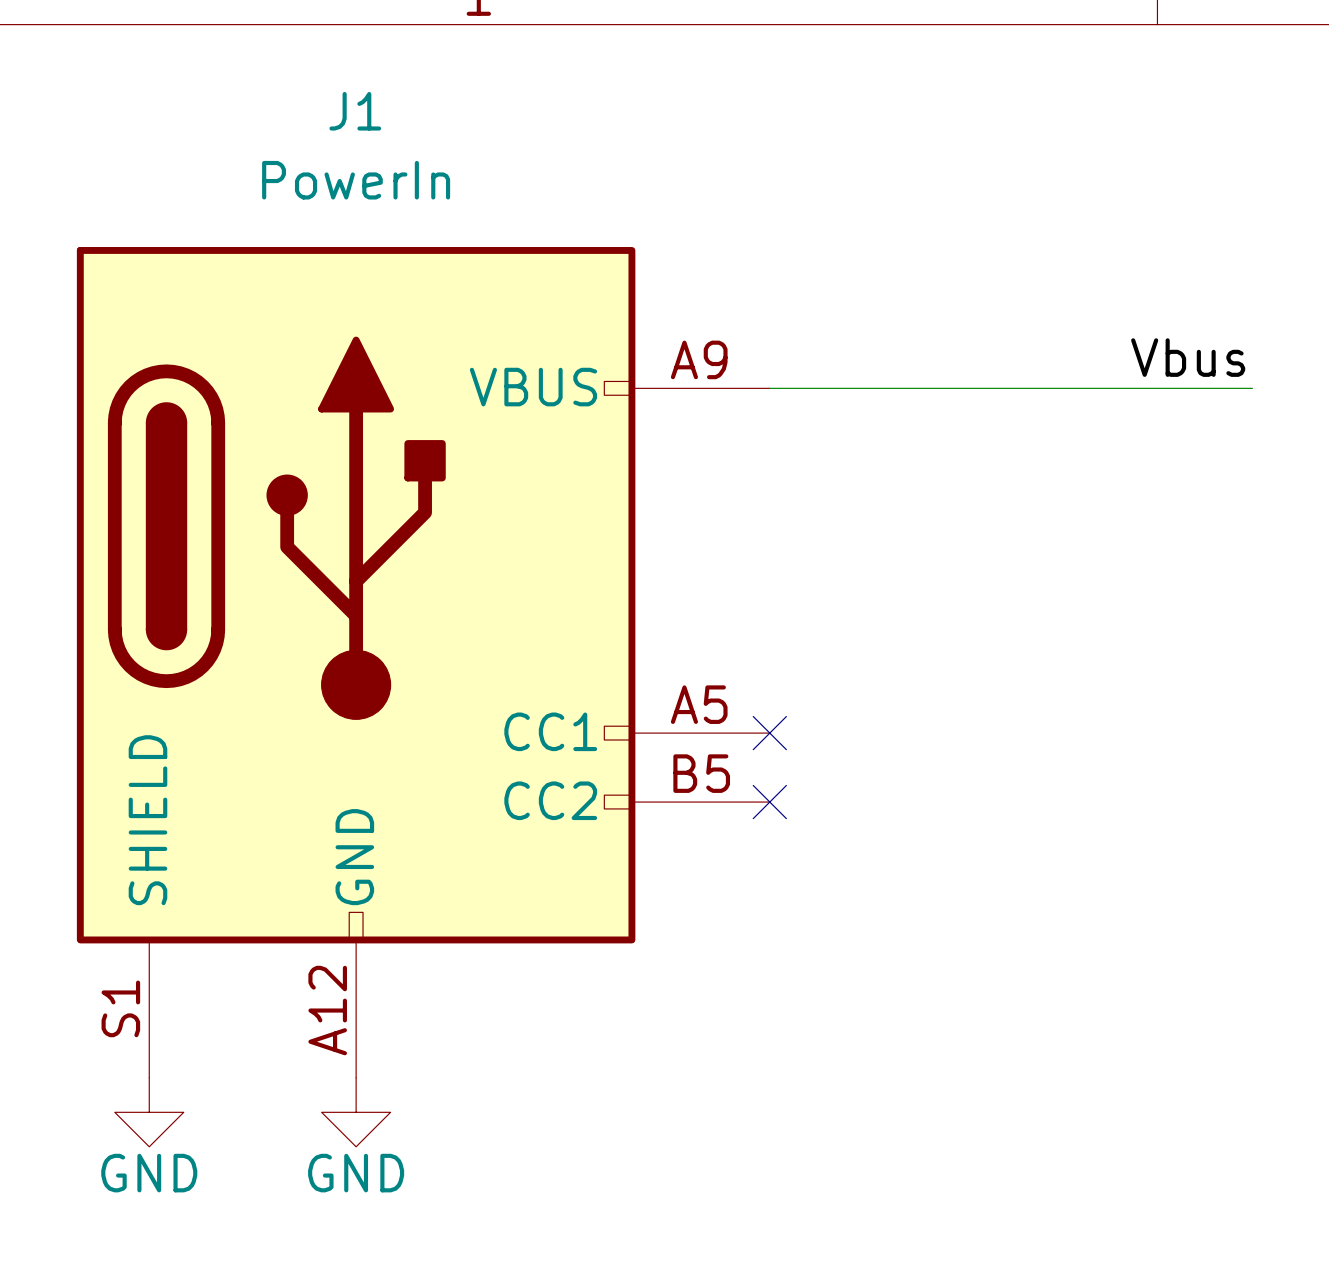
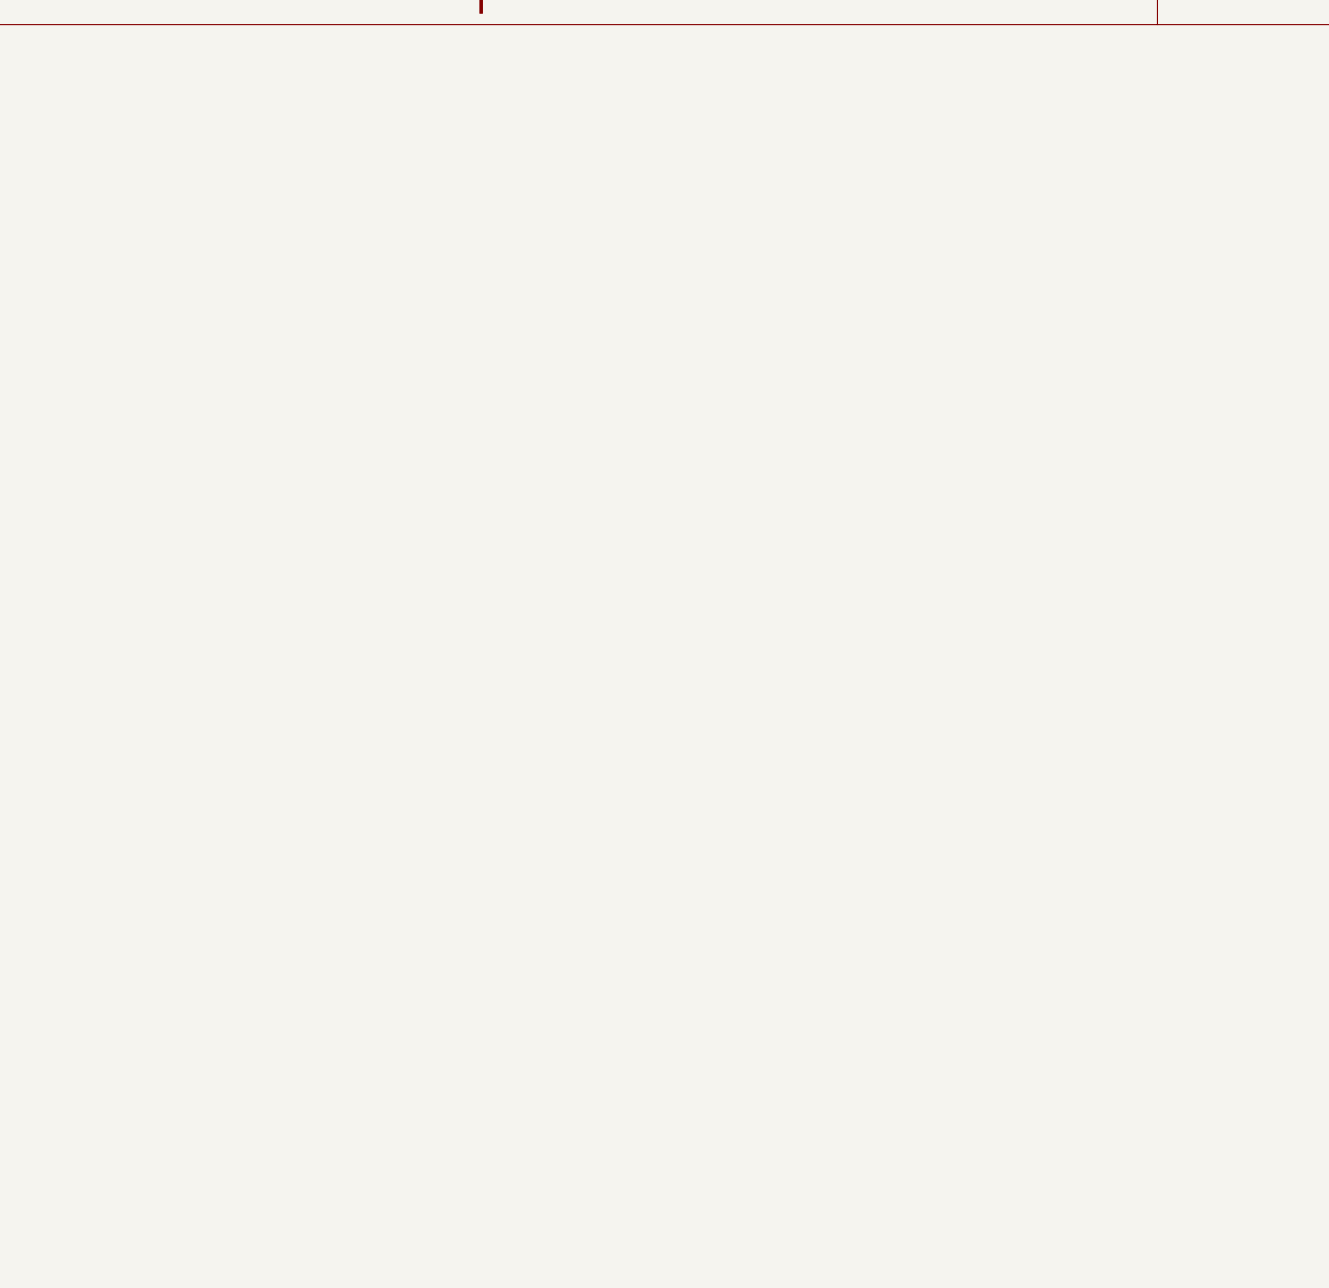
label: Vbus (1188, 357) -> none
wire: (769, 388) (1252, 388) -> none
J1: PowerIn (423, 662) -> none
no-connect mark: (769, 733) -> none
no-connect mark: (769, 802) -> none
power symbol: GND (149, 1112) -> none
power symbol: GND (356, 1112) -> none

